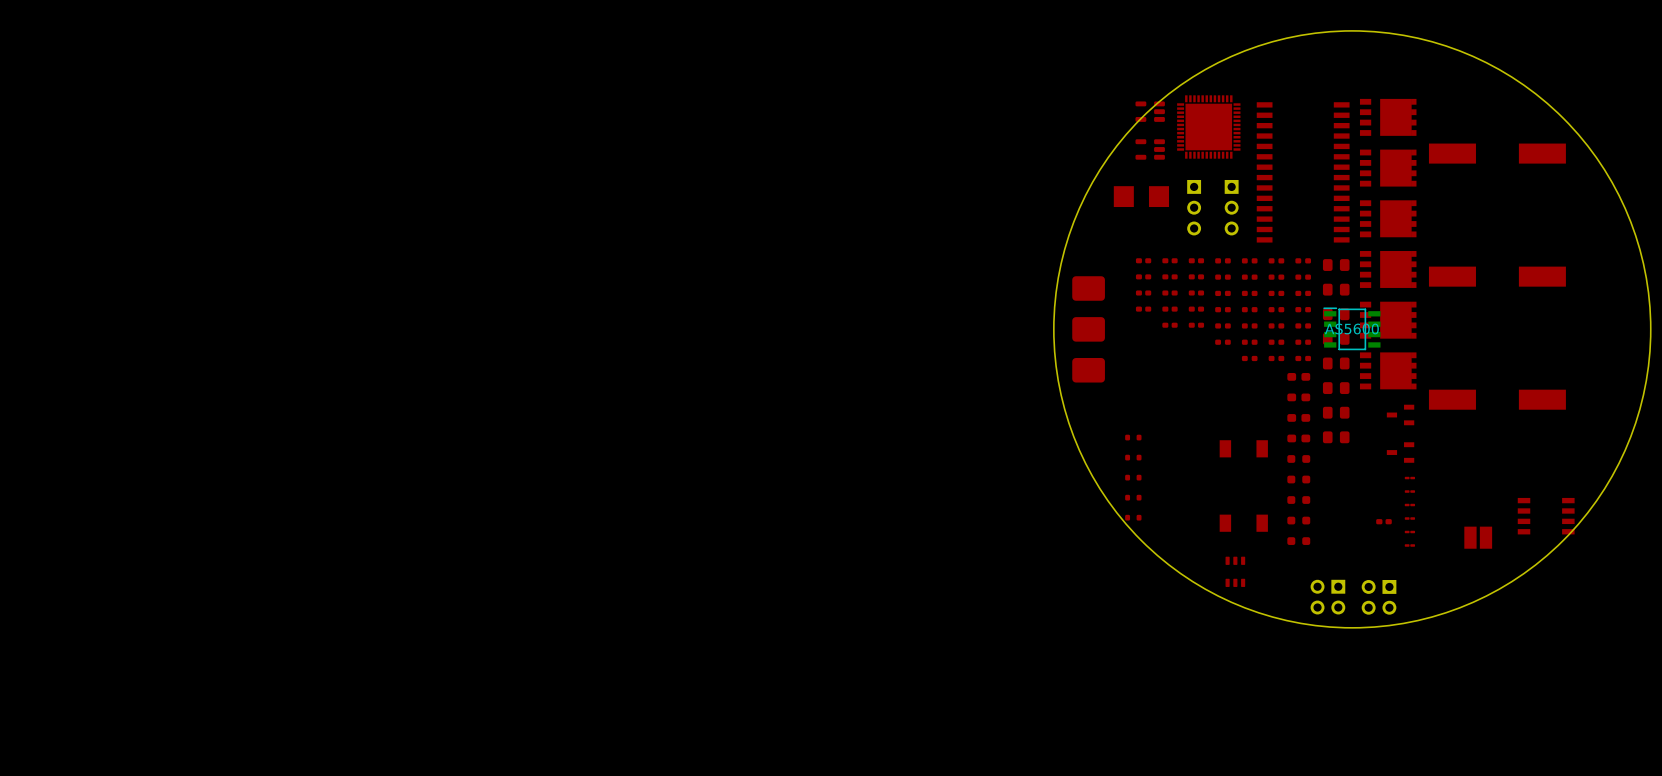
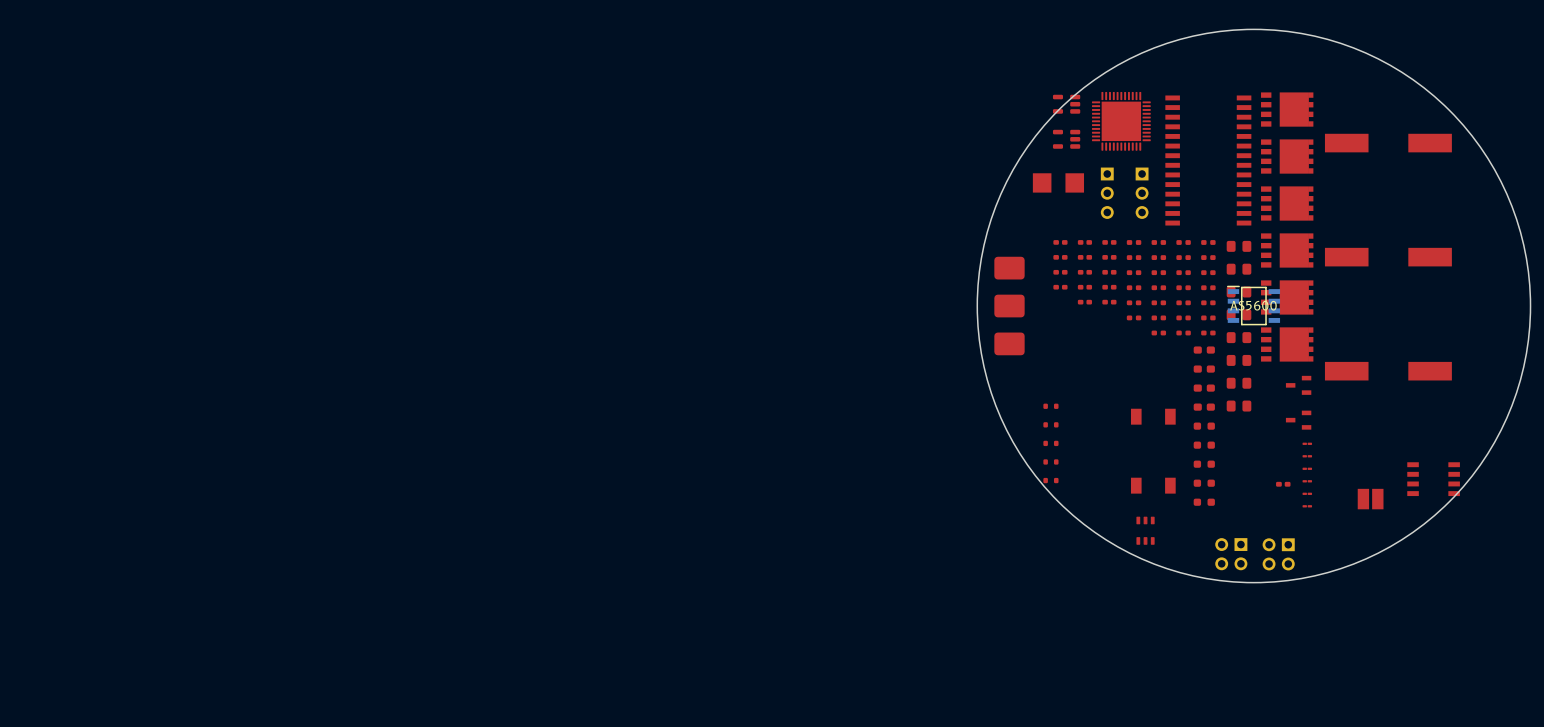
part footprint: [1177, 95, 1241, 159] -> [1091, 91, 1151, 151]

